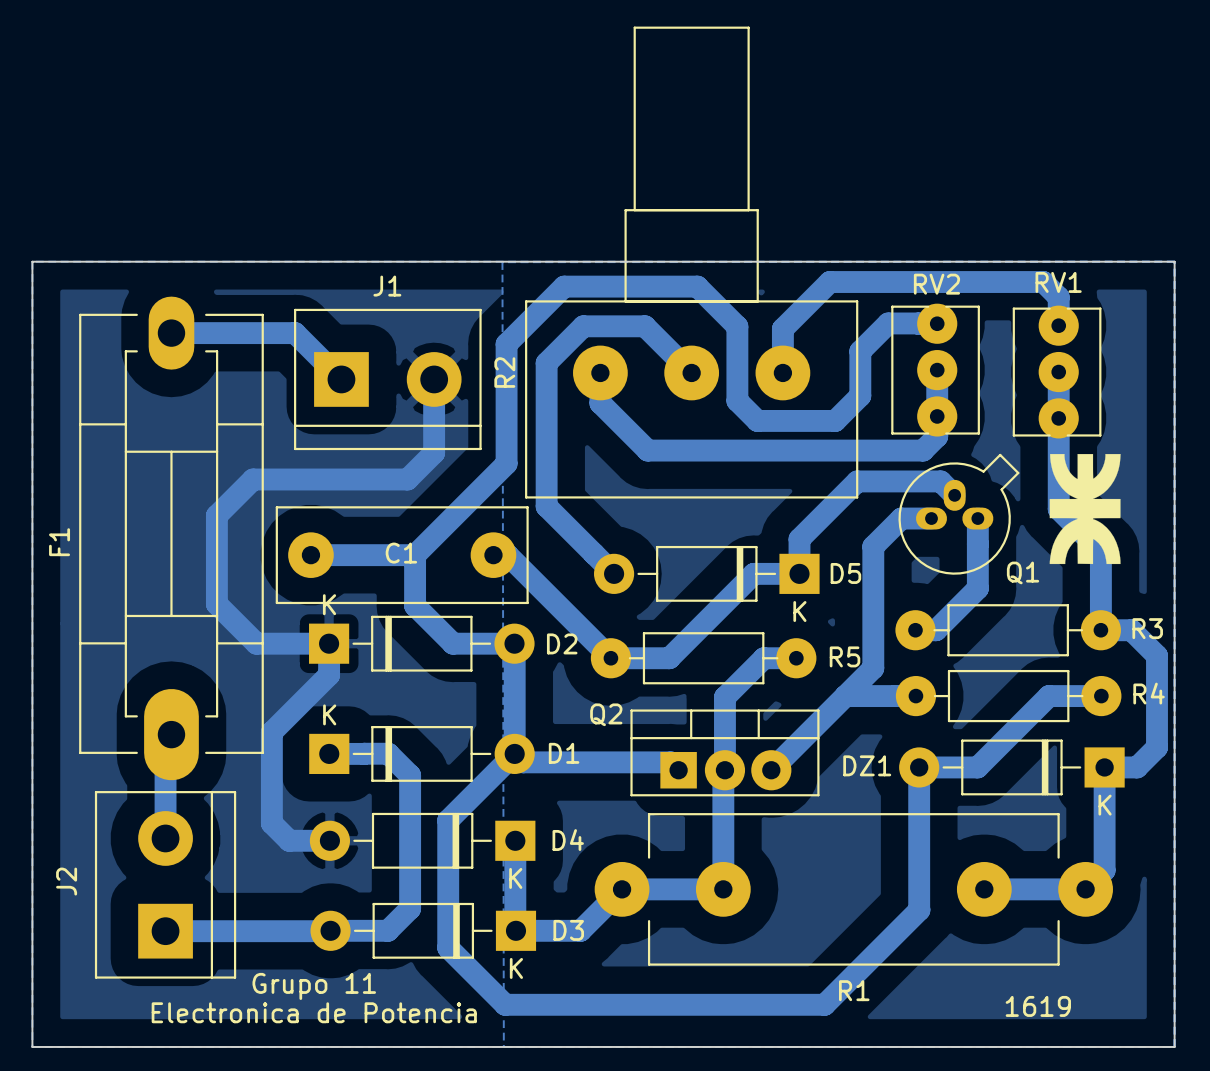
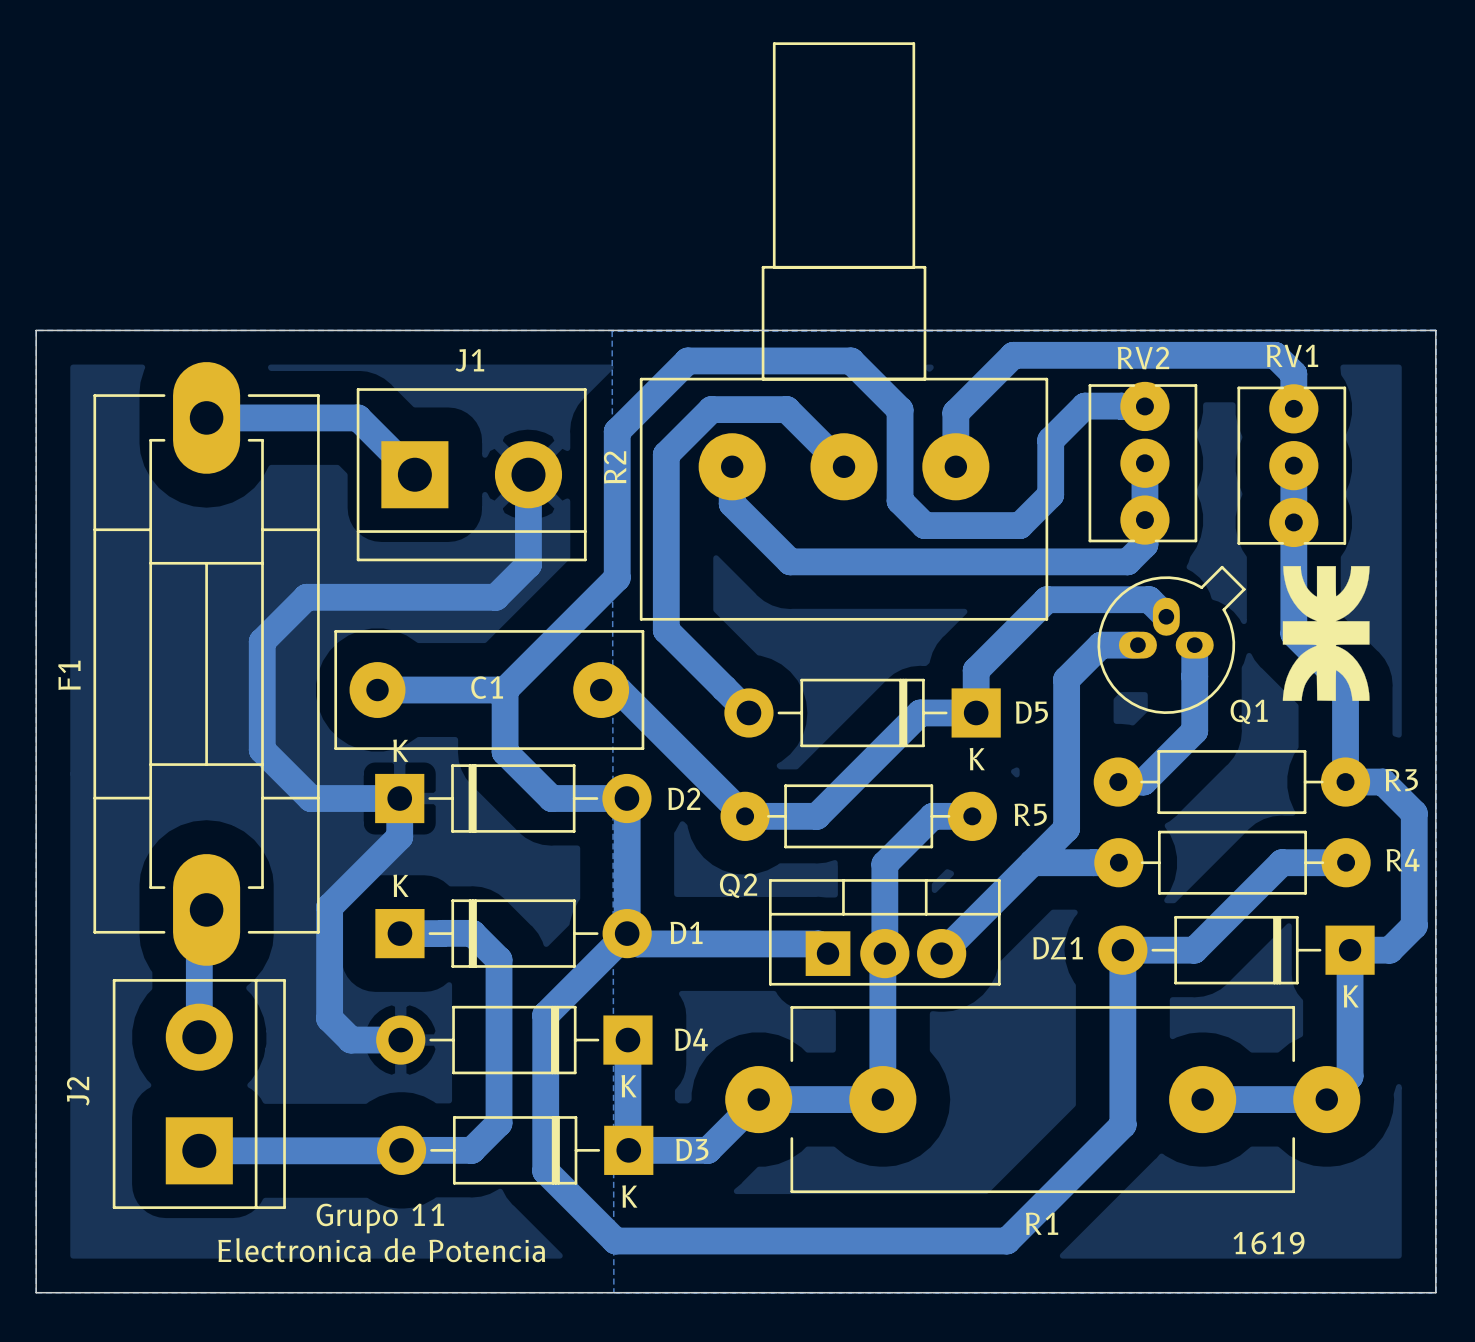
F1 footprint: [79, 296, 264, 781] -> [93, 362, 320, 966]

